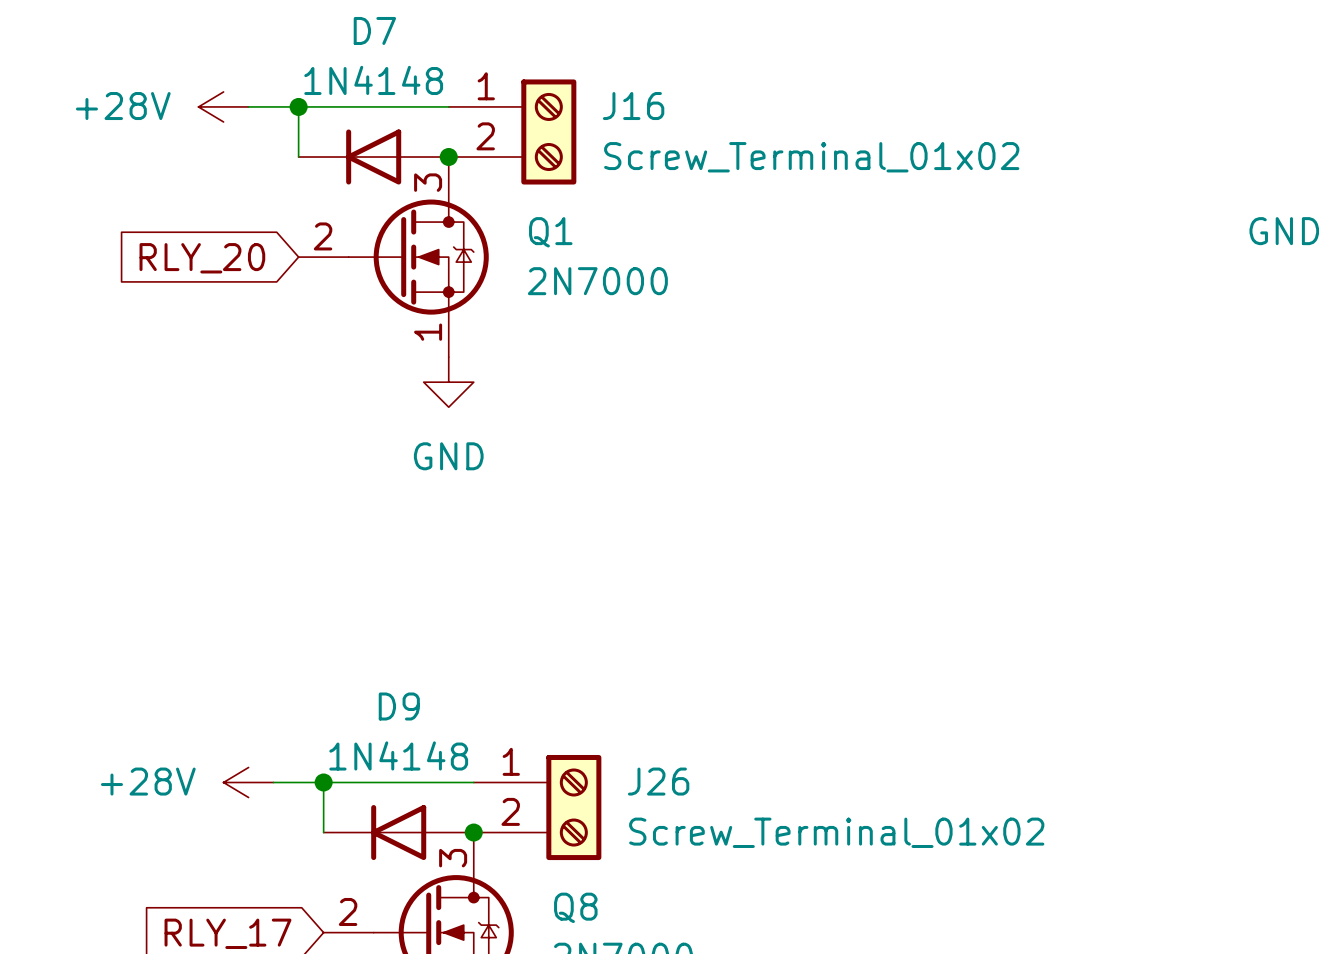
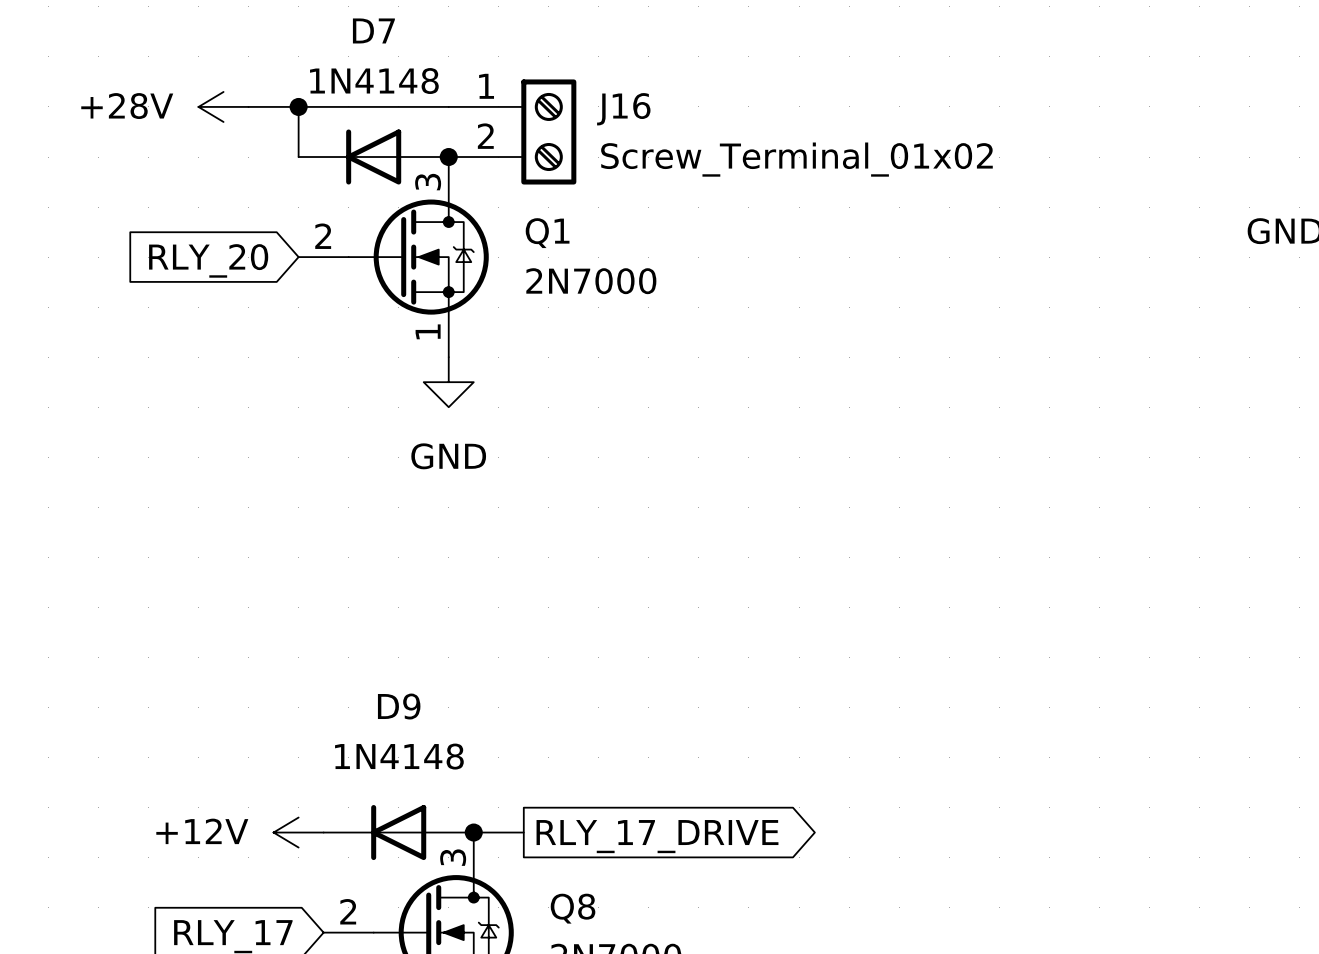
power symbol: +28V (248, 782) -> none
wire: (273, 782) (473, 782) -> none
wire: (323, 782) (323, 832) -> none
junction: (323, 782) -> none
J26: Screw_Terminal_01x02 (537, 807) -> none
power symbol: none -> +12V (298, 832)
global label: none -> RLY_17_DRIVE (657, 836)

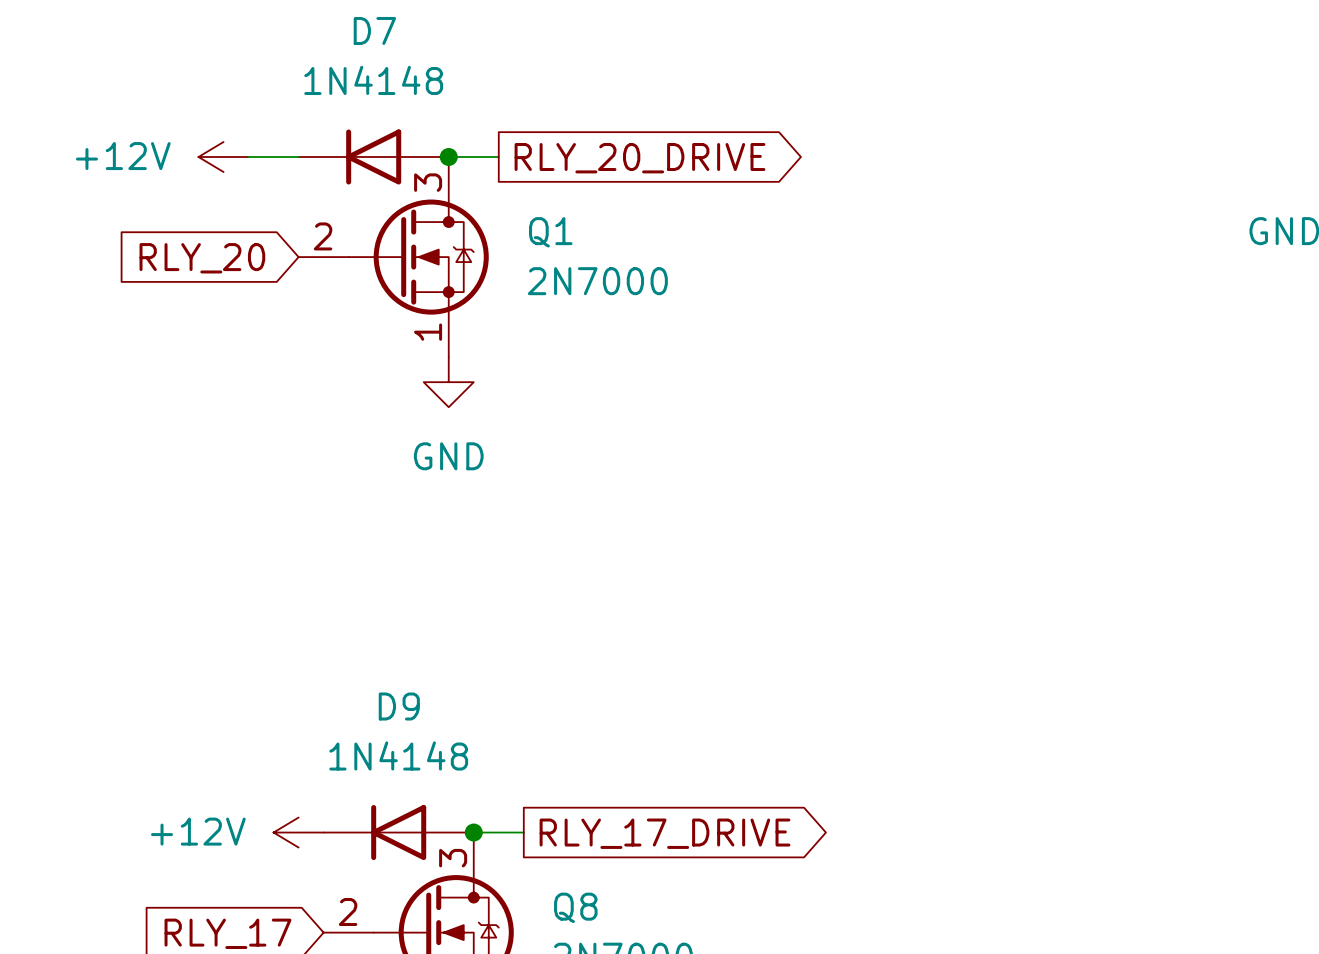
power symbol: +28V (223, 106) -> none
wire: (248, 106) (448, 106) -> none
wire: (298, 106) (298, 157) -> (248, 157) (298, 157)
junction: (298, 106) -> none
J16: Screw_Terminal_01x02 (512, 131) -> none
power symbol: none -> +12V (223, 157)
global label: none -> RLY_20_DRIVE (640, 158)

